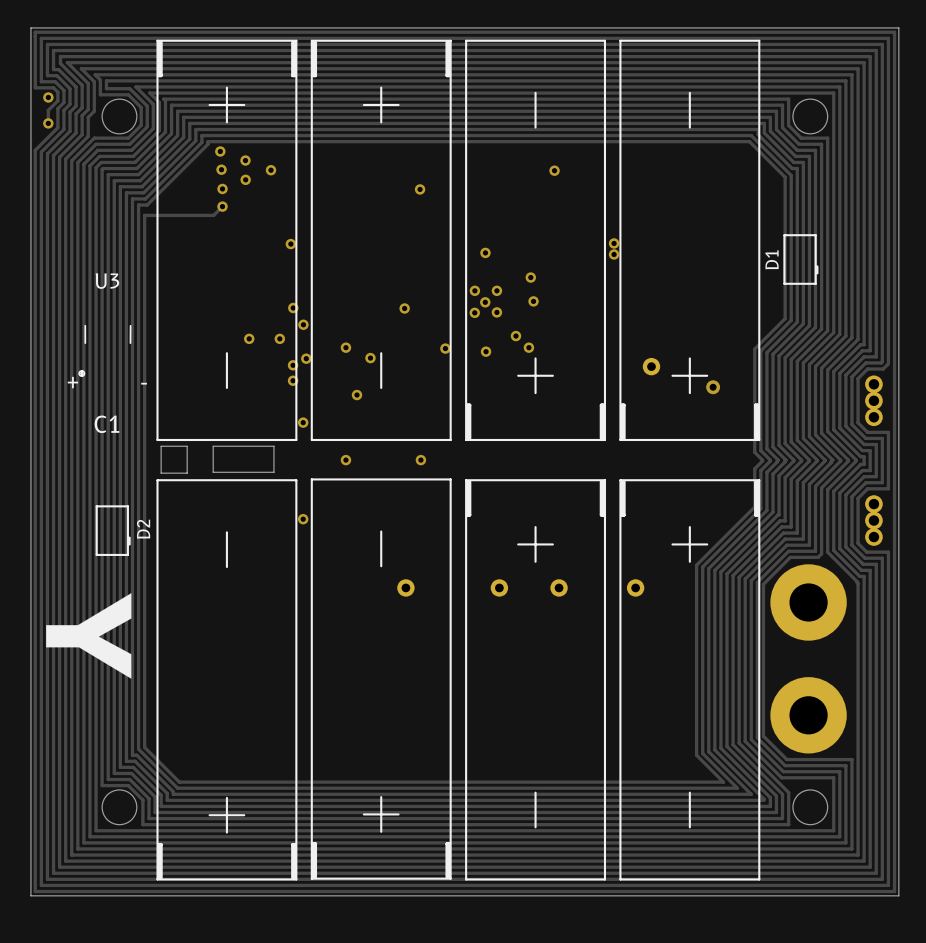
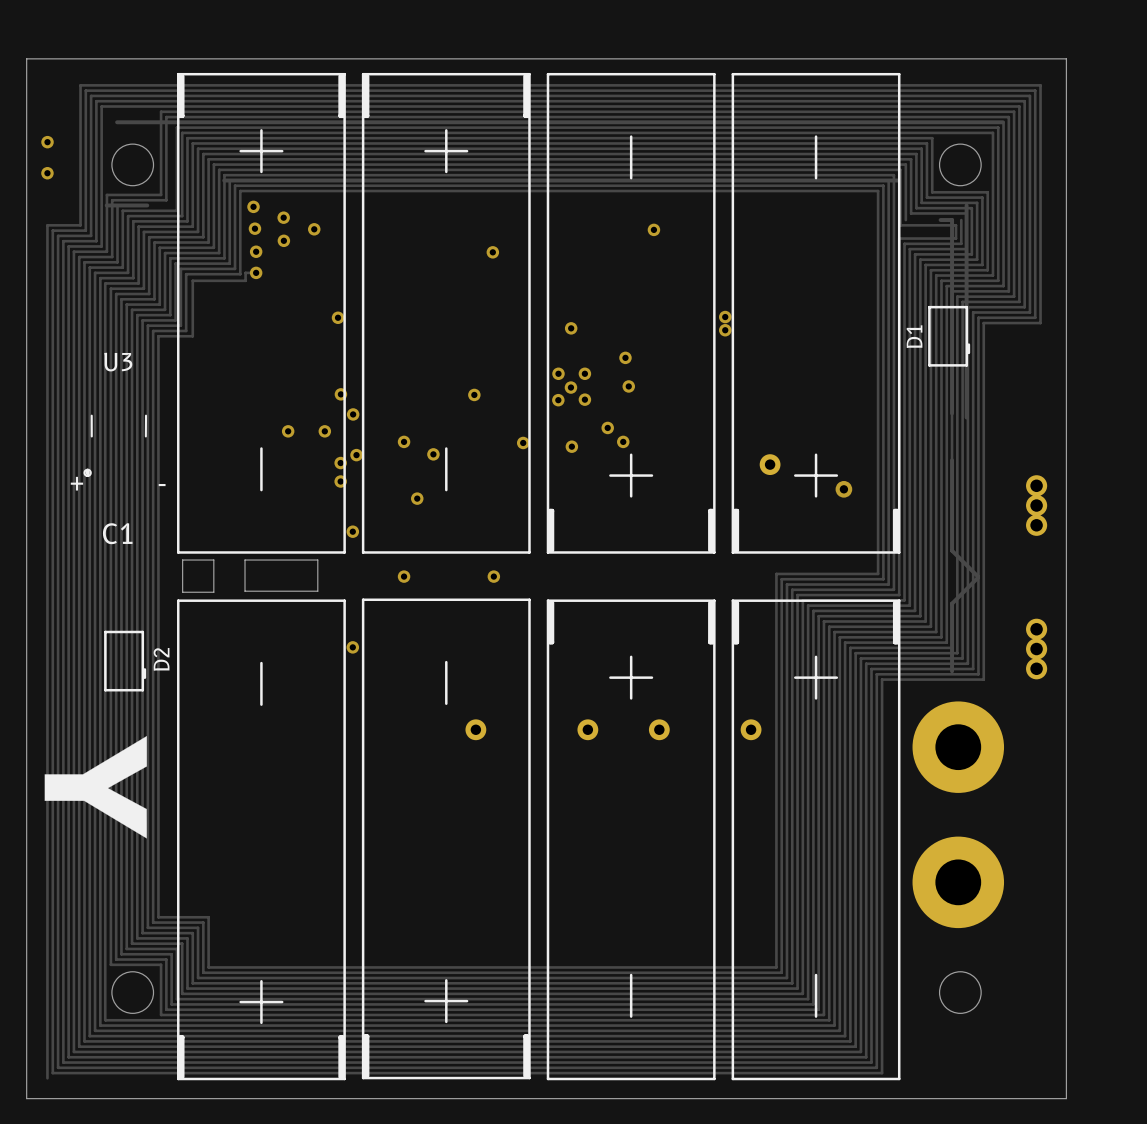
track: (106, 80) (106, 88) (129, 88) (147, 106) (147, 126) (129, 144) (96, 144) (77, 162) (77, 848) (851, 848) (851, 759) (786, 759) (763, 736) (763, 584) (790, 557) (818, 557) (821, 553) (821, 487) (848, 461) (821, 433) (821, 368) (851, 337) (851, 74) (95, 74) (100, 80) (100, 94) (128, 94) (141, 107) (141, 125) (128, 138) (94, 138) (71, 160) (71, 855) (858, 855) (858, 583) (827, 552) (827, 489) (856, 461) (827, 431) (827, 369) (858, 339) (858, 68) (81, 68) (94, 81) (94, 111) (88, 117) (88, 136) (65, 159) (65, 861) (864, 861) (864, 576) (859, 576) (833, 550) (833, 491) (860, 464) (864, 464) (864, 456) (860, 456) (833, 429) (833, 371) (860, 344) (864, 344) (864, 62) (67, 62) (88, 83) (88, 109) (82, 115) (82, 134) (59, 157) (59, 867) (870, 867) (870, 570) (861, 570) (839, 548) (839, 493) (862, 470) (870, 470) (870, 450) (862, 450) (839, 428) (839, 373) (862, 350) (870, 350) (870, 56) (60, 56) (60, 63) (82, 85) (82, 107) (76, 113) (76, 132) (53, 155) (53, 873) (876, 873) (876, 564) (863, 564) (845, 546) (845, 494) (864, 476) (876, 476) (876, 444) (864, 444) (845, 426) (845, 375) (864, 356) (876, 356) (876, 50) (53, 50) (53, 69) (58, 69) (76, 86) (76, 106) (70, 112) (70, 131) (47, 153) (47, 879) (882, 879) (882, 558) (864, 558) (851, 545) (851, 496) (865, 482) (882, 482) (882, 438) (865, 438) (851, 424) (851, 376) (865, 362) (882, 362) (882, 44) (47, 44) (47, 75) (56, 75) (70, 88) (70, 104) (63, 110) (63, 129) (41, 152) (41, 885) (888, 885) (888, 552) (866, 552) (858, 543) (858, 498) (867, 488) (888, 488) (888, 432) (867, 432) (858, 422) (858, 378) (867, 369) (883, 369) (888, 363) (888, 38) (41, 38) (41, 81) (55, 81) (63, 90) (63, 102) (57, 108) (57, 127) (35, 150) (35, 891) (894, 891) (894, 32) (35, 32) (35, 87) (53, 87) (57, 92) (57, 100) (48, 110) (48, 123) -> none
track: (845, 80) (845, 336) (815, 366) (815, 434) (840, 461) (815, 486) (815, 551) (788, 551) (757, 582) (757, 737) (785, 765) (845, 765) (845, 842) (83, 842) (83, 164) (97, 150) -> (1003, 122) (1003, 286) (946, 286) (946, 642) (845, 642) (845, 1036) (89, 1036) (89, 267) (122, 267) (122, 210) (176, 210) (176, 127) (998, 127) (998, 280) (941, 280) (941, 637) (839, 637) (839, 1030) (95, 1030) (95, 272) (128, 272) (128, 216) (182, 216) (182, 132) (992, 132) (992, 275) (936, 275) (936, 632) (834, 632) (834, 1025) (100, 1025) (100, 278) (133, 278) (133, 221) (187, 221) (187, 138) (932, 138) (932, 192) (987, 192) (987, 270) (930, 270) (930, 626) (829, 626) (829, 1020) (105, 1020) (105, 283) (138, 283) (138, 226) (192, 226) (192, 143) (926, 143) (926, 197) (982, 197) (982, 264) (925, 264) (925, 621) (823, 621) (823, 1015) (161, 1015) (161, 964) (110, 964) (110, 288) (143, 288) (143, 231) (198, 231) (198, 148) (921, 148) (921, 202) (977, 202) (977, 259) (920, 259) (920, 616) (818, 616) (818, 1009) (166, 1009) (166, 959) (116, 959) (116, 294) (149, 294) (149, 237) (203, 237) (203, 154) (916, 154) (916, 208) (971, 208) (971, 254) (915, 254) (915, 610) (813, 610) (813, 1004) (171, 1004) (171, 954) (121, 954) (121, 299) (154, 299) (154, 242) (208, 242) (208, 159) (911, 159) (911, 213) (966, 213)
track: (195, 129) (195, 140) (143, 192) (126, 192) (126, 761) (135, 761) (167, 793) (167, 800) (763, 800) (714, 750) (714, 570) (772, 512) (772, 474) (786, 460) (772, 447) (772, 354) (803, 323) -> (952, 460) (952, 413)
track: none -> (229, 180) (229, 263) (175, 263) (175, 320) (142, 320) (142, 933) (192, 933) (192, 983) (792, 983) (792, 589) (893, 589) (893, 175) (224, 175) (224, 258) (170, 258) (170, 315) (137, 315) (137, 938) (187, 938) (187, 988) (797, 988) (797, 595) (899, 595) (899, 238) (956, 238) (956, 225) (900, 225) (900, 169) (219, 169) (219, 253) (165, 253) (165, 309) (132, 309) (132, 943) (182, 943) (182, 993) (802, 993) (802, 600) (904, 600) (904, 243) (961, 243) (961, 220)
track: (758, 129) (758, 134) (792, 168) (797, 168) (797, 322) (766, 352) (766, 448) (778, 460) (766, 472) (766, 510) (708, 568) (708, 751) (751, 794) (173, 794) (173, 791) (136, 755) (132, 755) (132, 198) (145, 198) (201, 142) (201, 135) (751, 135) (791, 175) (791, 320) (760, 350) (760, 450) (770, 460) (760, 470) (760, 508) (702, 566) (702, 753) (737, 788) (177, 788) (138, 749) (138, 205) (147, 205) (208, 144) (208, 141) (749, 141) (785, 177) (785, 318) (754, 349) (754, 452) (762, 460) (754, 468) (754, 507) (696, 565) (696, 755) (723, 782) (179, 782) (144, 747) (144, 215) (213, 215) (222, 206) -> (888, 180) (888, 584) (786, 584) (786, 978) (198, 978) (198, 927) (147, 927) (147, 325) (180, 325) (180, 268) (235, 268) (235, 185) (883, 185) (883, 579) (781, 579) (781, 972) (203, 972) (203, 922) (153, 922) (153, 330) (186, 330) (186, 274) (240, 274) (240, 191) (878, 191) (878, 573) (776, 573) (776, 967) (208, 967) (208, 917) (158, 917) (158, 336) (192, 336) (192, 280) (245, 280) (245, 272) (256, 272)
track: none -> (117, 205) (117, 262) (84, 262) (84, 1041) (850, 1041) (850, 647) (952, 647)
track: (131, 150) (153, 128) (153, 104) (135, 86) (839, 86) (839, 334) (809, 364) (809, 436) (832, 460) (809, 484) (809, 545) (786, 545) (751, 580) (751, 739) (783, 771) (839, 771) (839, 836) (89, 836) (89, 165) (99, 156) (133, 156) (159, 130) (159, 102) (149, 93) (833, 93) (833, 332) (803, 362) -> none
track: (815, 150) (797, 150) (776, 129) (776, 111) (177, 111) (177, 135) (138, 174) (108, 174) (108, 779) (129, 779) (148, 798) (148, 818) (782, 818) (782, 794) (733, 744) (733, 575) (781, 526) (791, 526) (791, 479) (809, 461) (791, 441) (791, 359) (821, 329) (821, 144) (799, 144) (782, 127) (782, 105) (171, 105) (171, 133) (136, 168) (102, 169) (102, 785) (128, 785) (142, 800) (142, 824) (788, 824) (788, 792) (739, 743) (739, 577) (783, 533) (797, 533) (797, 480) (817, 461) (797, 440) (797, 361) (827, 330) (827, 138) (801, 138) (788, 125) (788, 99) (163, 99) (165, 100) (165, 132) (135, 162) (101, 162) (96, 167) (96, 830) (833, 830) (833, 777) (781, 777) (745, 741) (745, 579) (785, 539) (803, 539) -> none
track: none -> (905, 220) (905, 164) (213, 164) (213, 247) (159, 247) (159, 304) (126, 304) (126, 948) (176, 948) (176, 999) (808, 999) (808, 605) (909, 605) (909, 249) (966, 249)
track: (793, 162) (764, 132) (764, 123) (189, 123) (189, 139) (142, 186) (120, 186) (120, 767) (133, 767) (161, 795) (161, 806) (770, 806) (770, 797) (720, 748) (720, 572) (779, 514) (779, 475) (793, 461) (779, 445) (779, 356) (809, 325) (809, 156) (795, 156) (770, 131) (770, 117) (183, 117) (183, 137) (140, 180) (114, 180) (114, 773) (131, 773) (155, 796) (155, 812) (776, 812) (776, 796) (726, 746) (726, 573) (779, 520) (785, 520) (785, 477) (801, 461) (785, 443) (785, 357) (815, 327) -> none
track: none -> (952, 291) (1008, 291) (1008, 117) (166, 117) (166, 200) (112, 200) (112, 257) (79, 257) (79, 1046) (855, 1046) (855, 653) (957, 653) (957, 296) (1014, 296) (1014, 111) (161, 111) (161, 194) (106, 194) (106, 251) (73, 251) (73, 1051) (860, 1051) (860, 658) (962, 658) (962, 301) (1019, 301) (1019, 106) (101, 106) (101, 246) (68, 246) (68, 1057) (866, 1057) (866, 663) (967, 663) (967, 307) (1024, 307) (1024, 101) (96, 101) (96, 241) (63, 241) (63, 1062) (871, 1062) (871, 669) (973, 669) (973, 312) (1029, 312) (1029, 95) (91, 95) (91, 235) (58, 235) (58, 1067) (876, 1067) (876, 674) (978, 674) (978, 317) (1035, 317) (1035, 90) (85, 90) (85, 230) (52, 230) (52, 1073) (882, 1073) (882, 679) (983, 679) (983, 323) (1040, 323) (1040, 85) (80, 85) (80, 225) (47, 225) (47, 1078)

